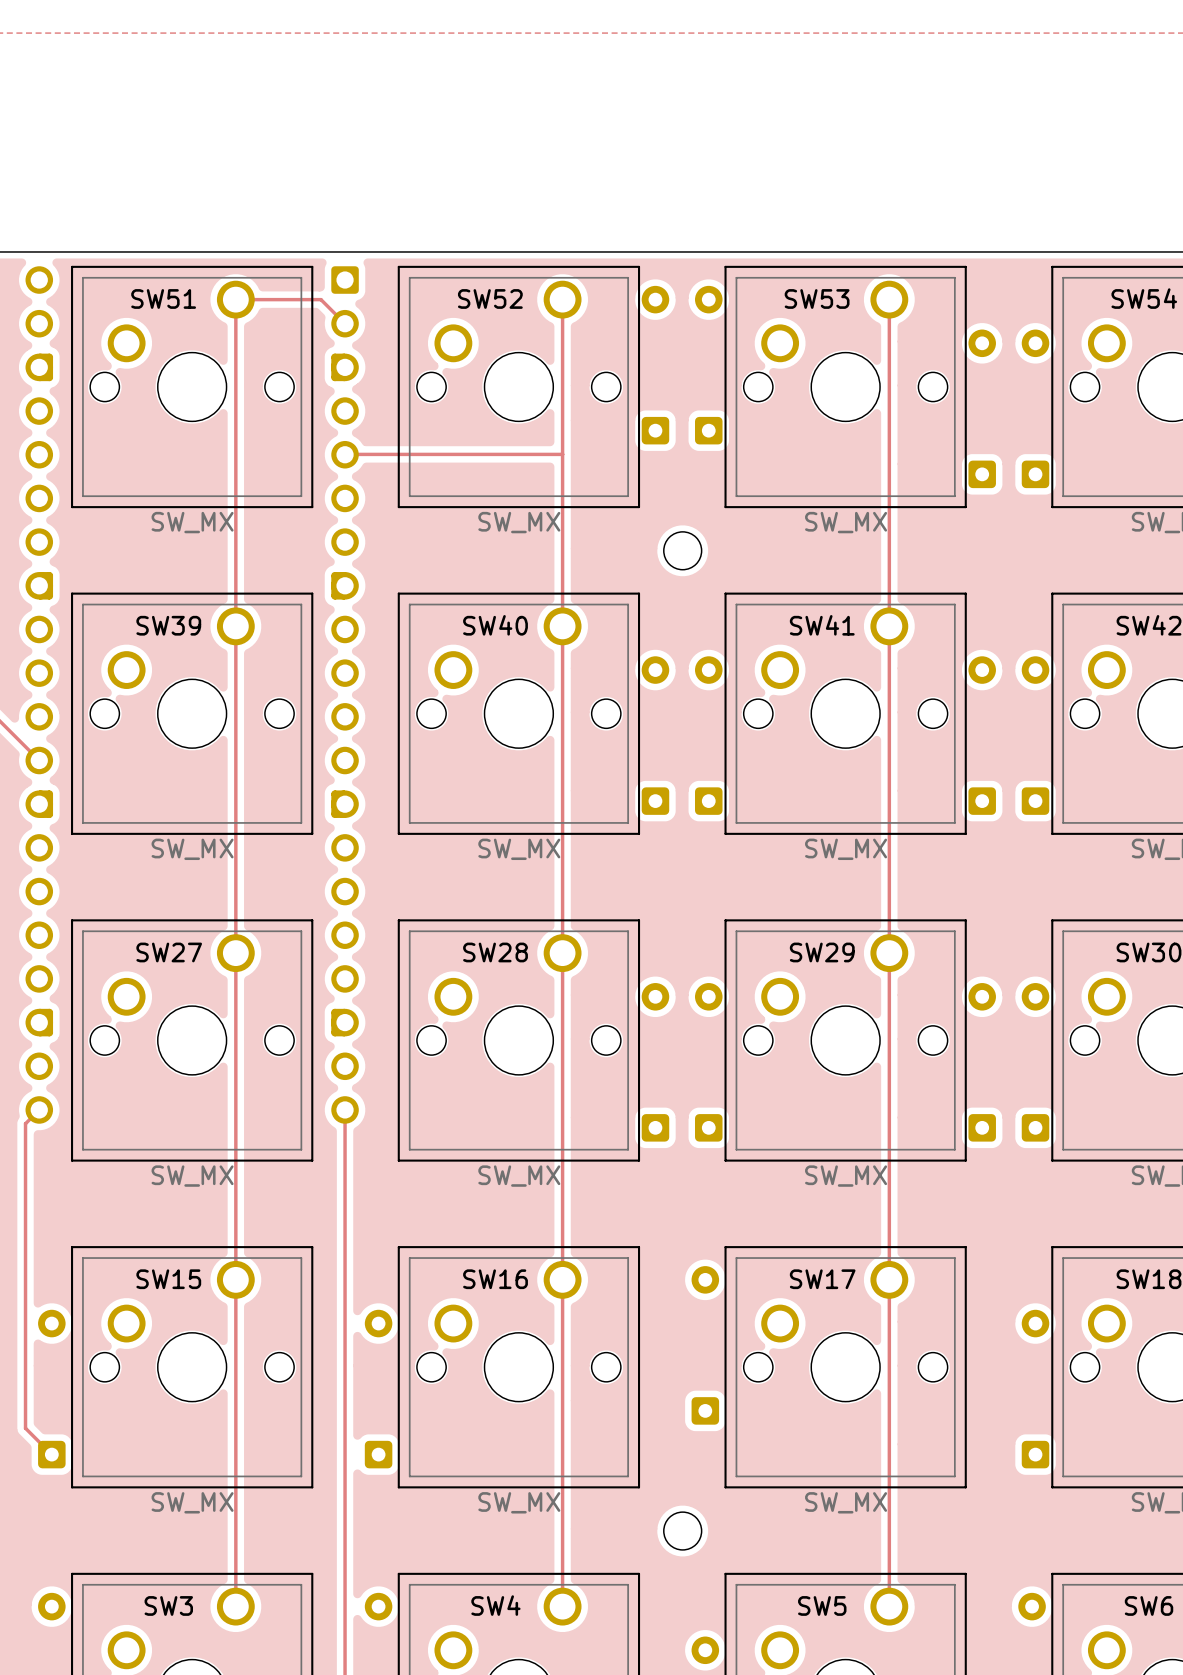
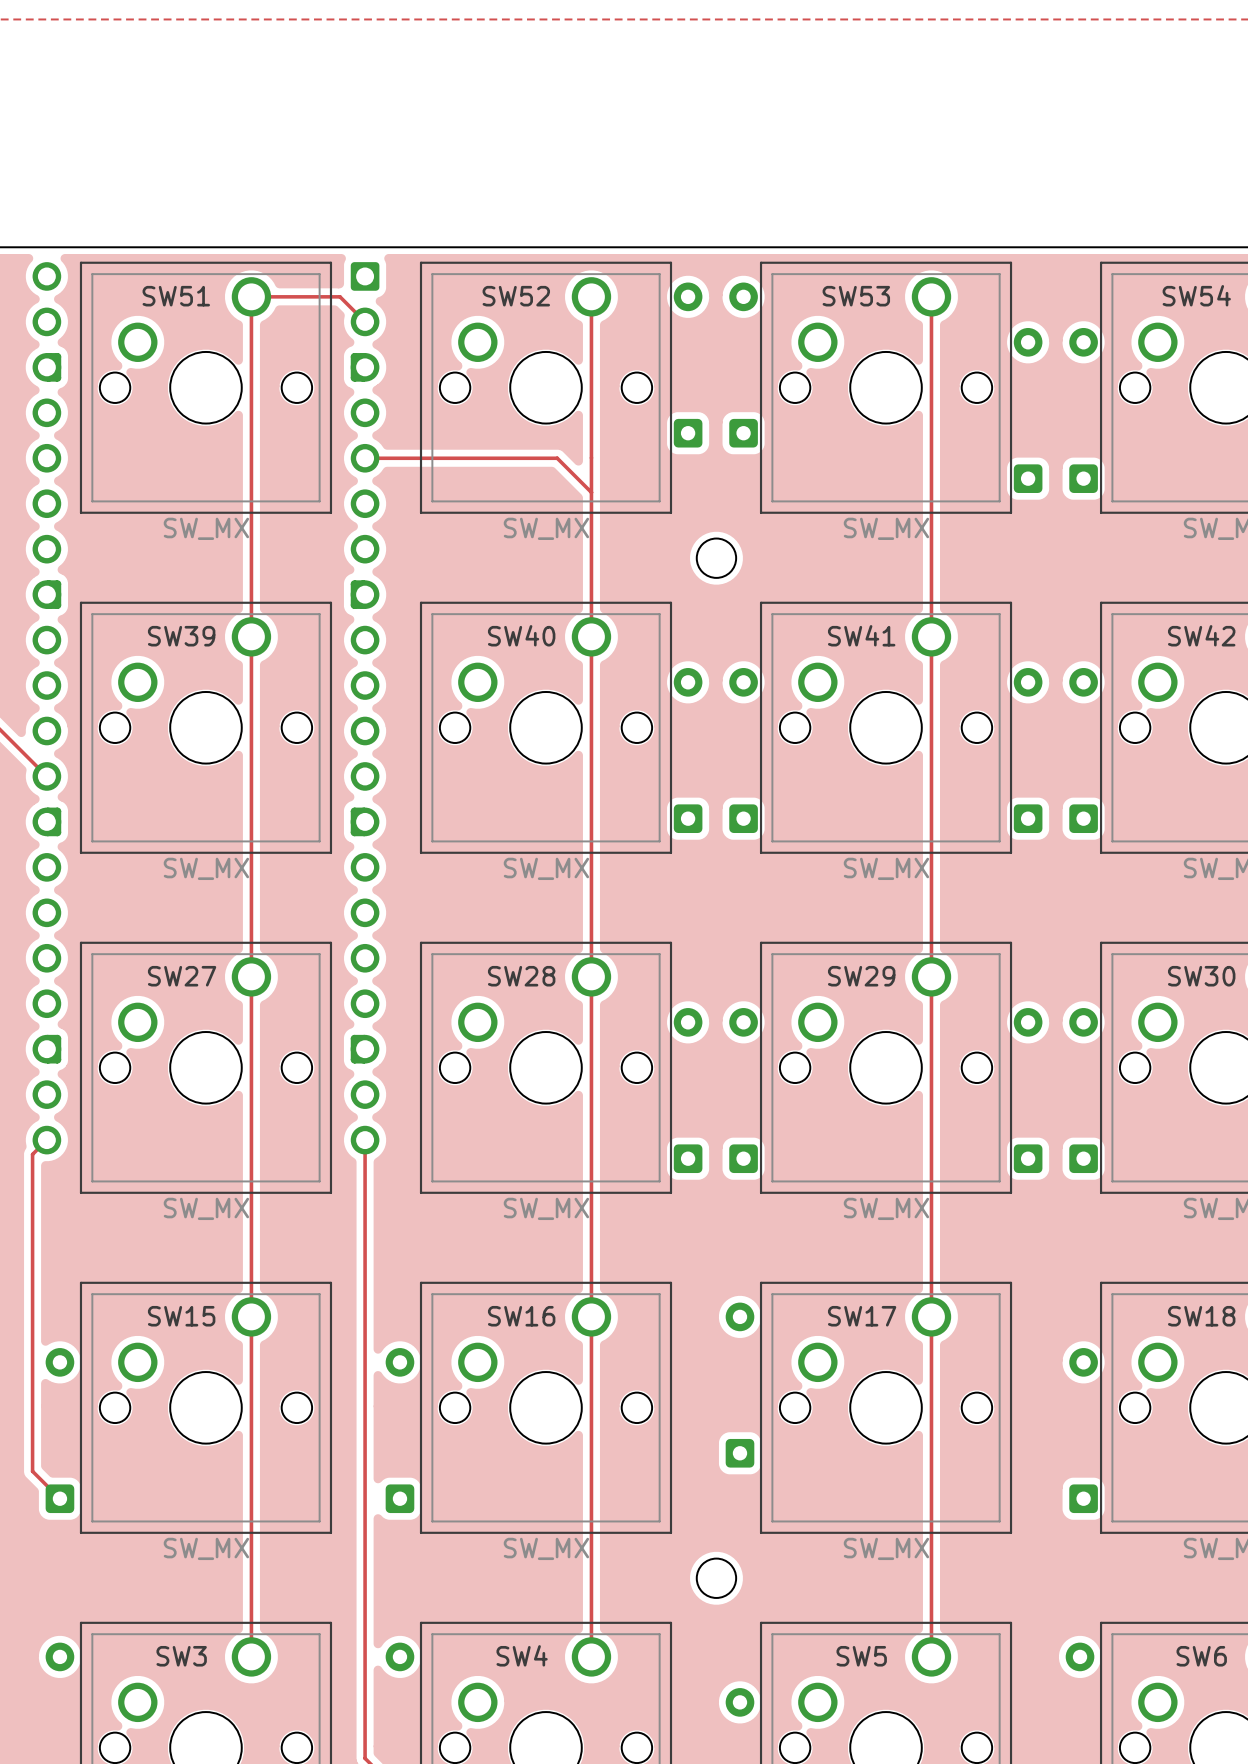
track: (345, 454) (562, 454) -> (365, 458) (557, 458) (591, 492)

